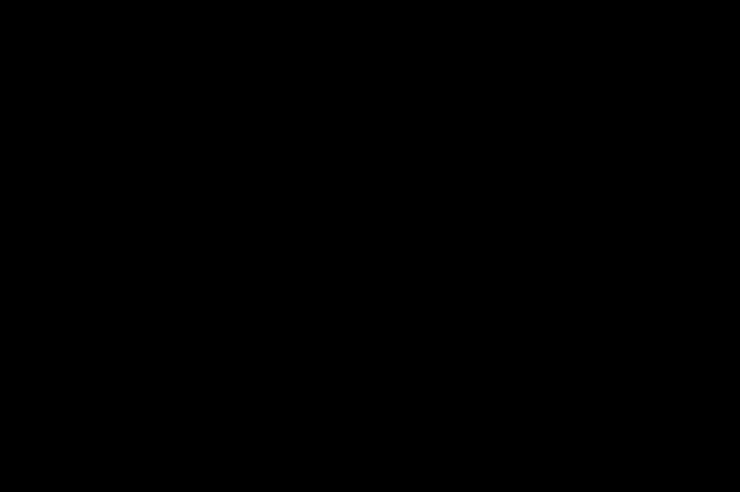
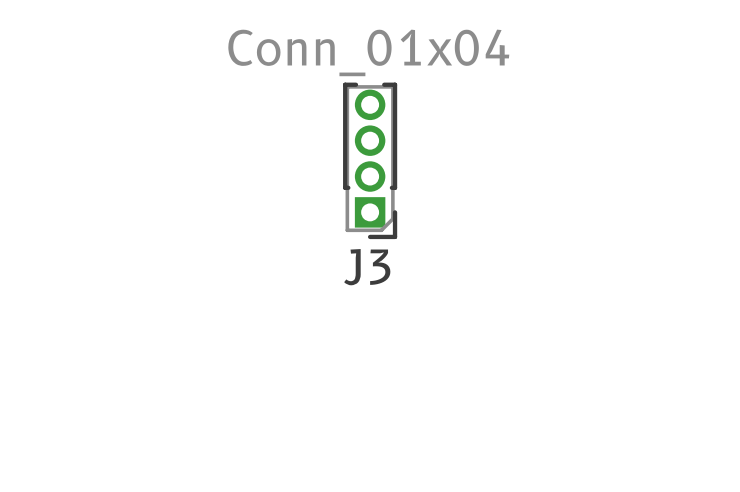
J3: none -> Conn_01x04 (370, 160)

